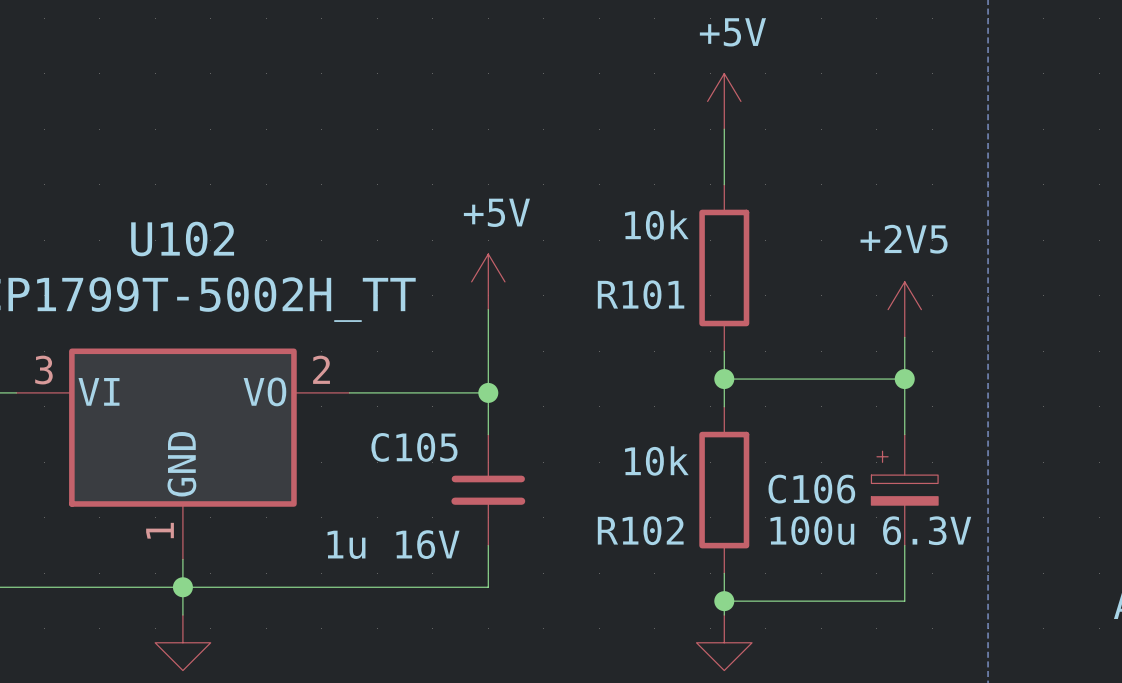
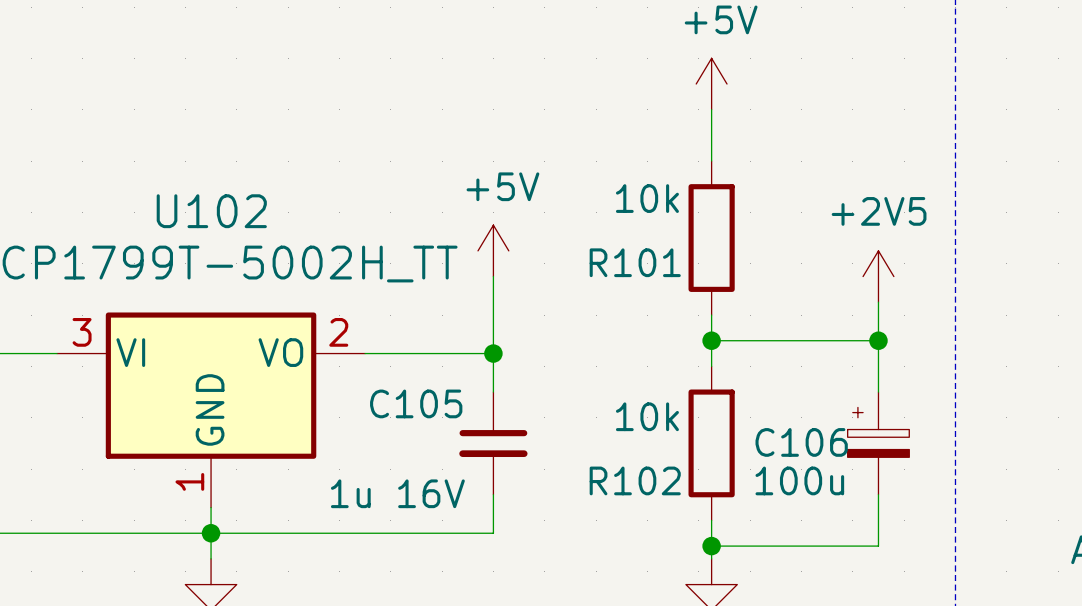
C106 value: 100u 6.3V (870, 530) -> 100u (799, 480)

